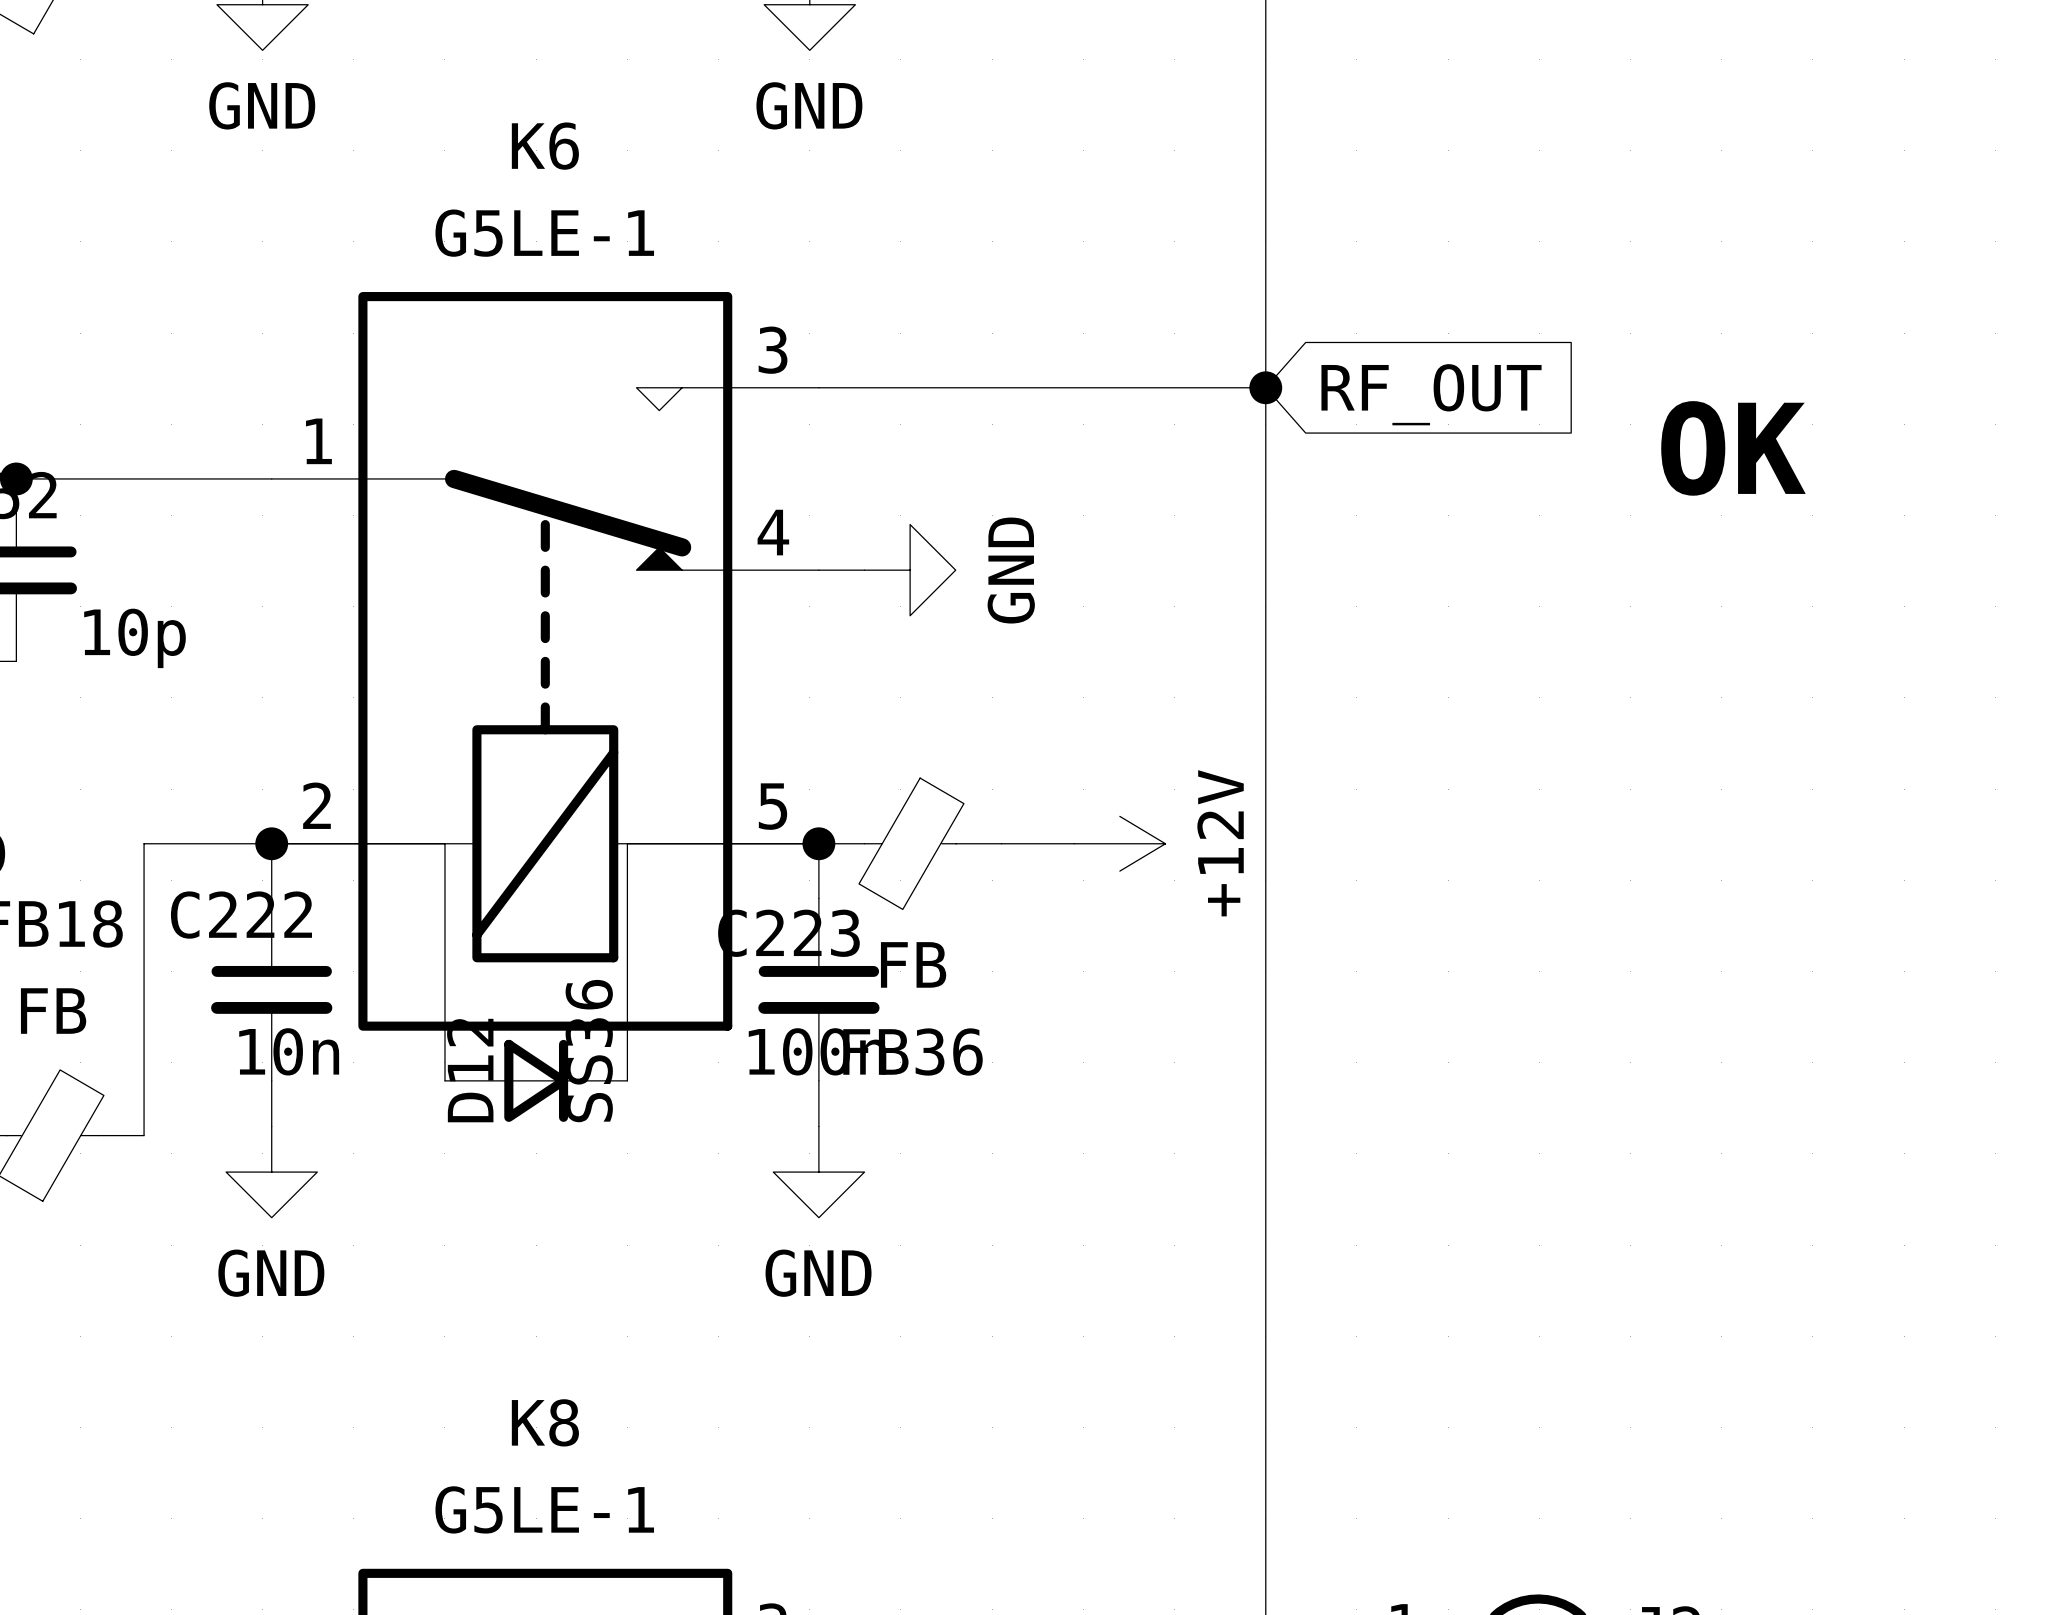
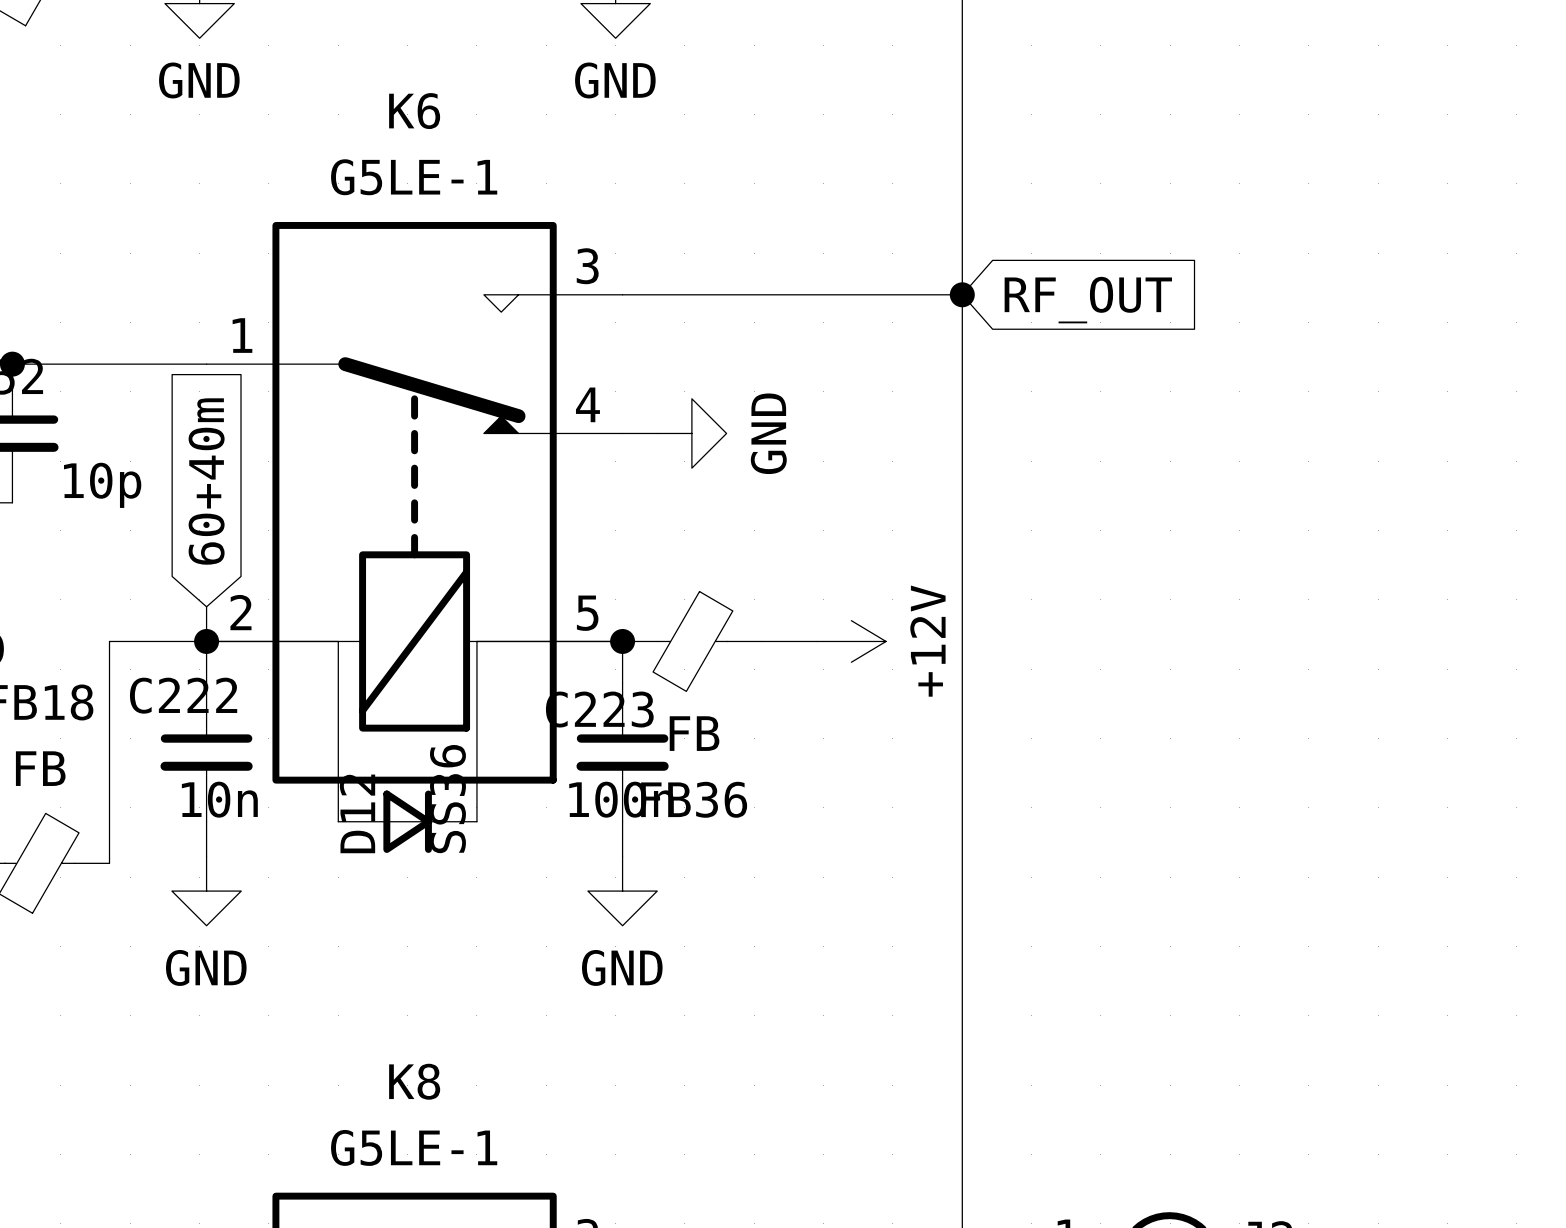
text: OK (1733, 448) -> none
global label: none -> 60+40m (206, 481)
wire: none -> (206, 606) (206, 641)

